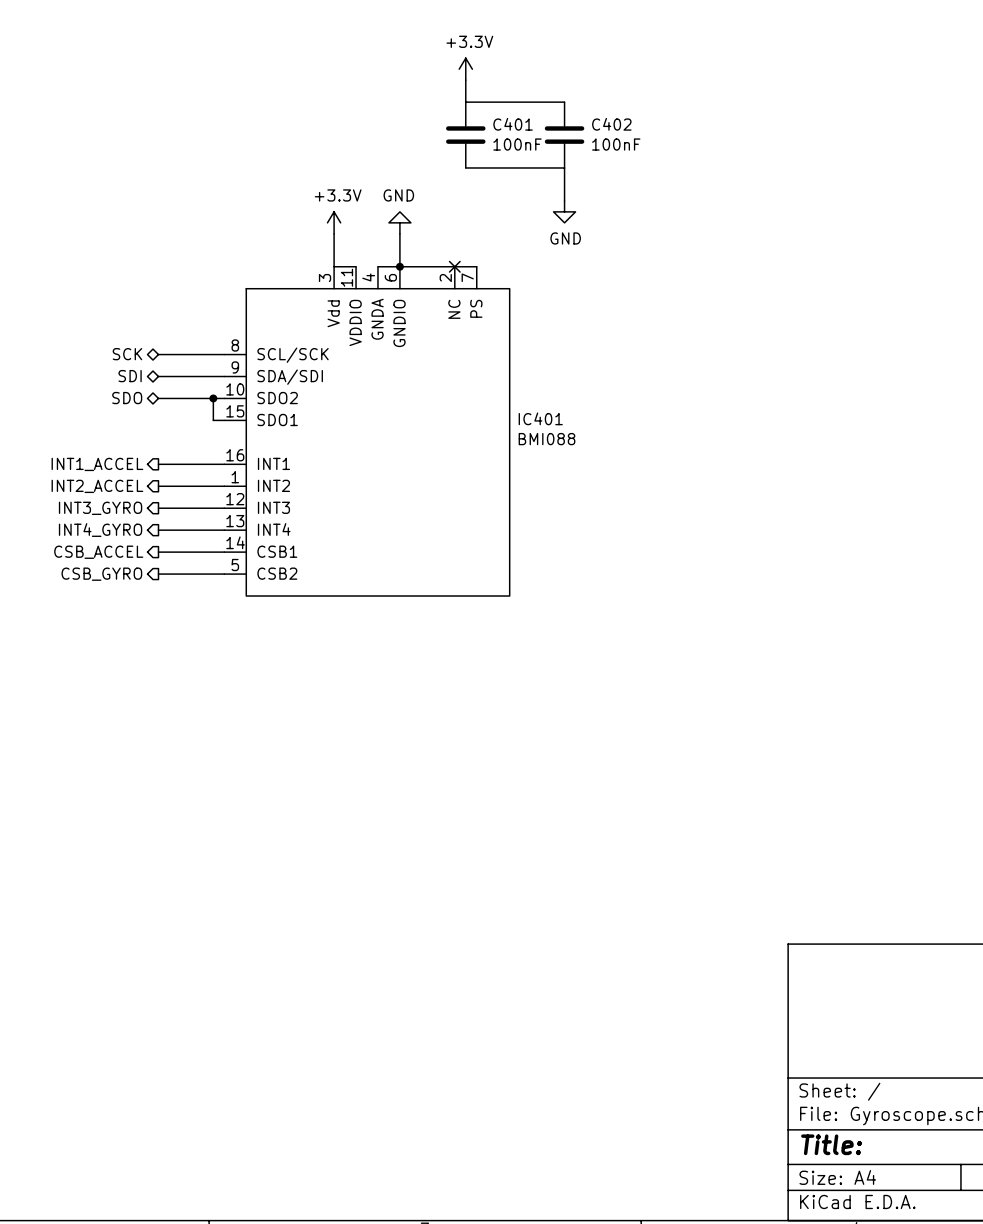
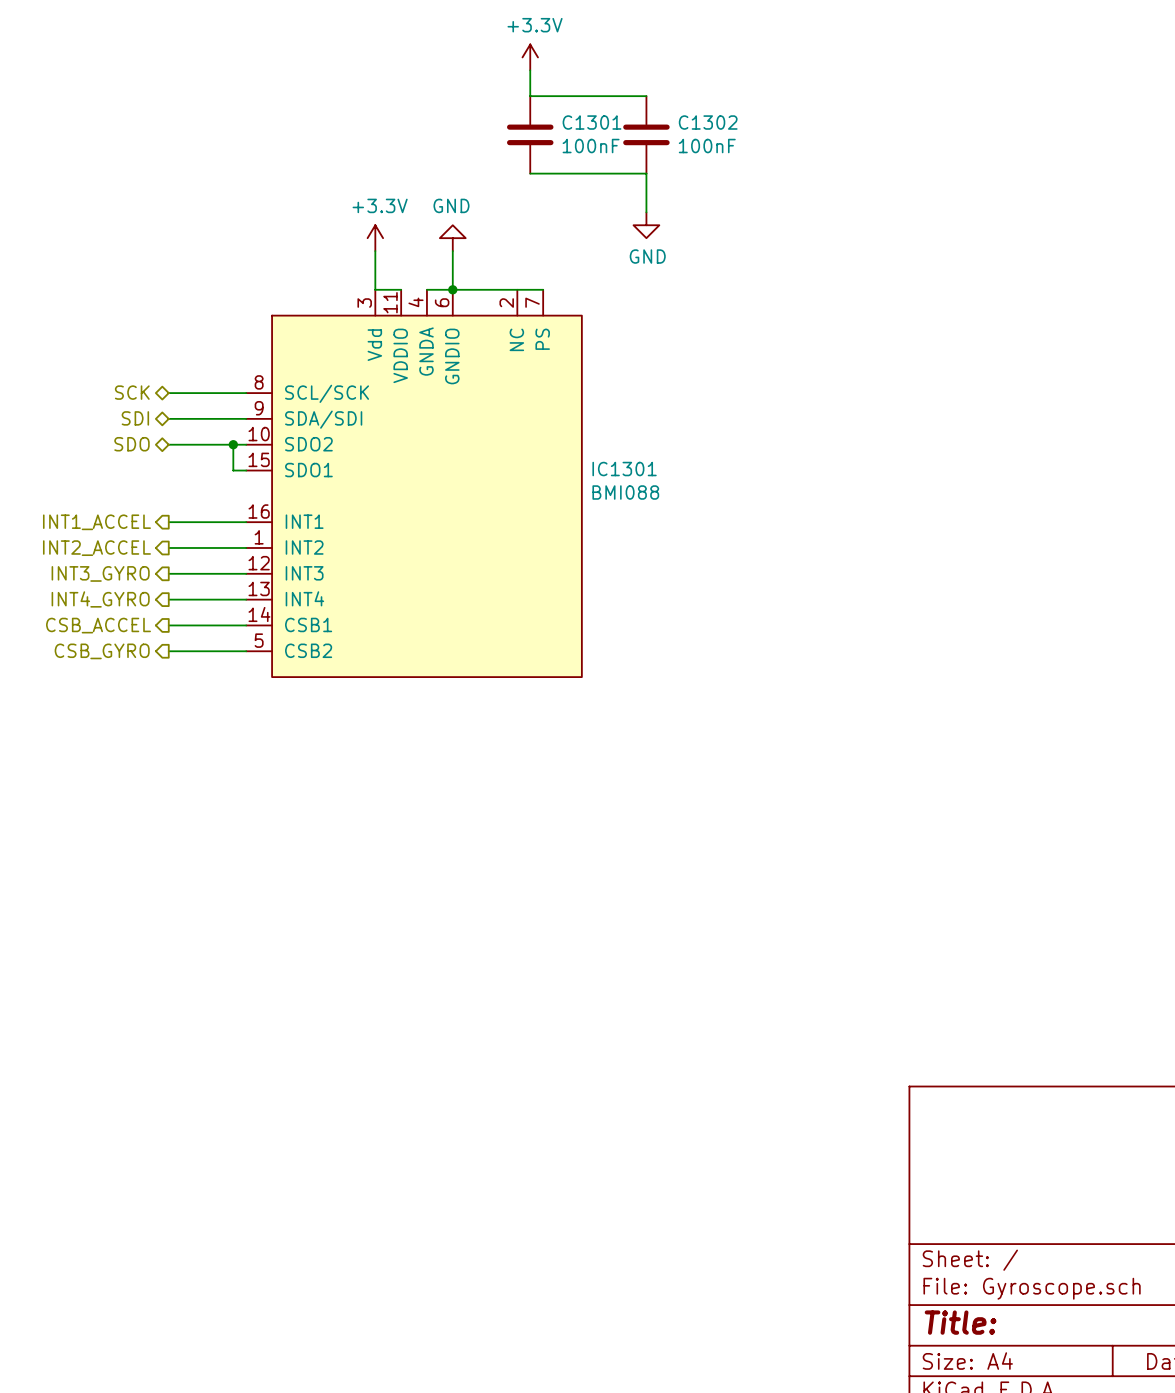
C401 name: C401 (513, 124) -> C1301 (592, 122)
C402 name: C402 (611, 124) -> C1302 (708, 122)
no-connect mark: (454, 266) -> none
IC401 name: IC401 (540, 418) -> IC1301 (624, 469)

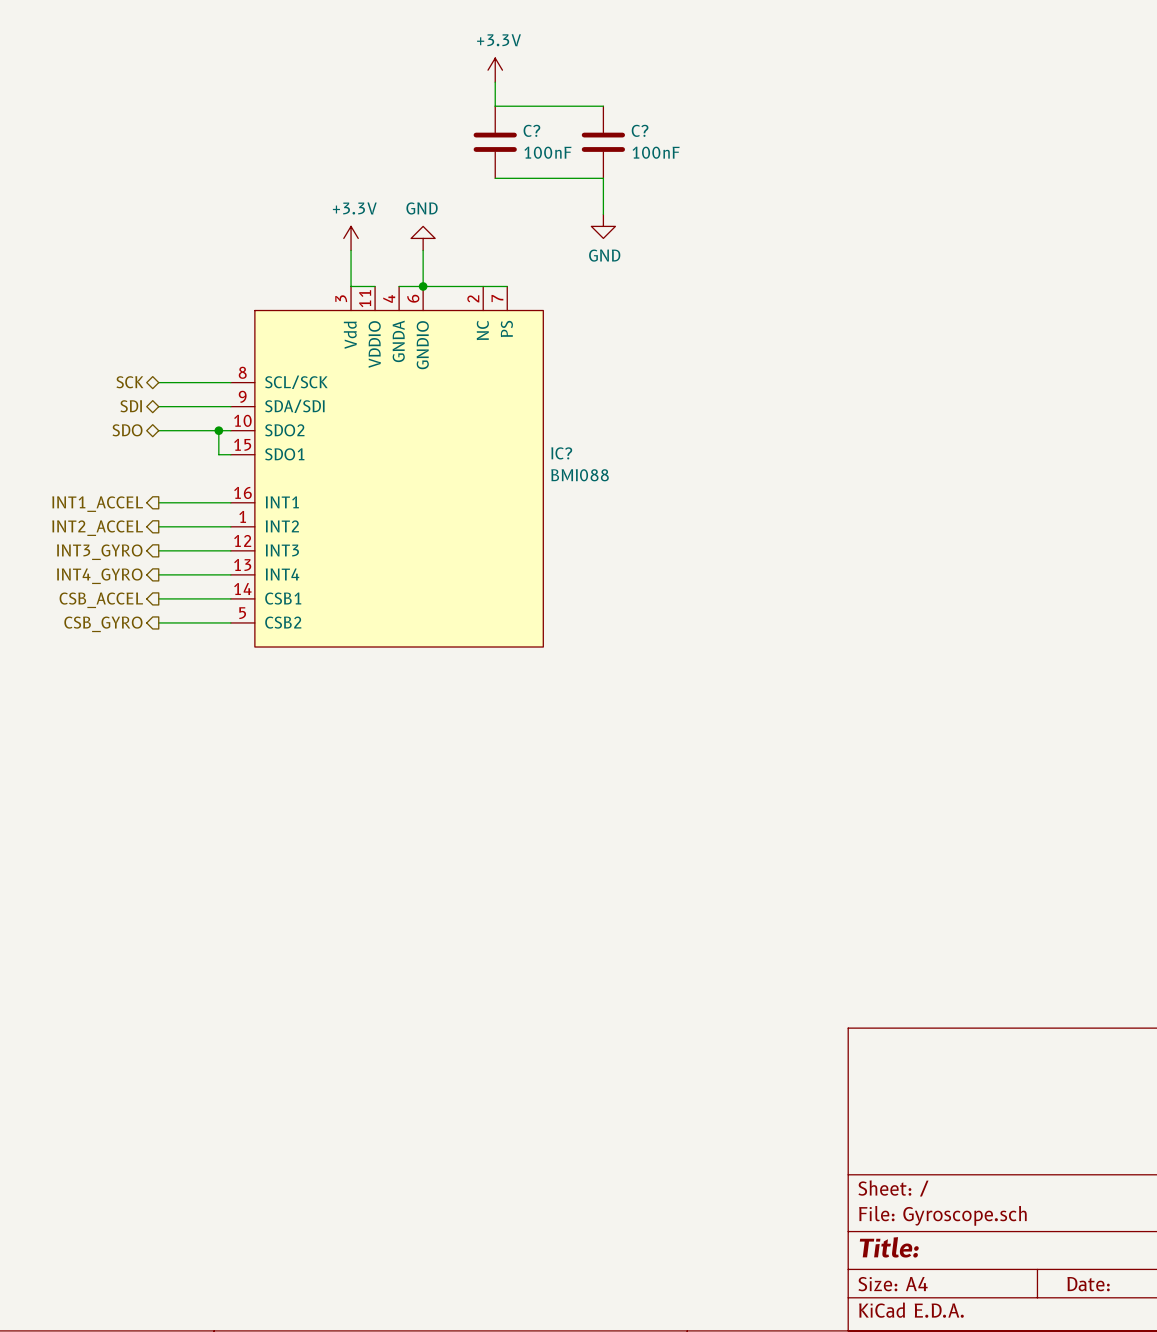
C1301 name: C1301 (592, 122) -> C? (531, 130)
C1302 name: C1302 (708, 122) -> C? (640, 130)
IC1301 name: IC1301 (624, 469) -> IC? (561, 453)

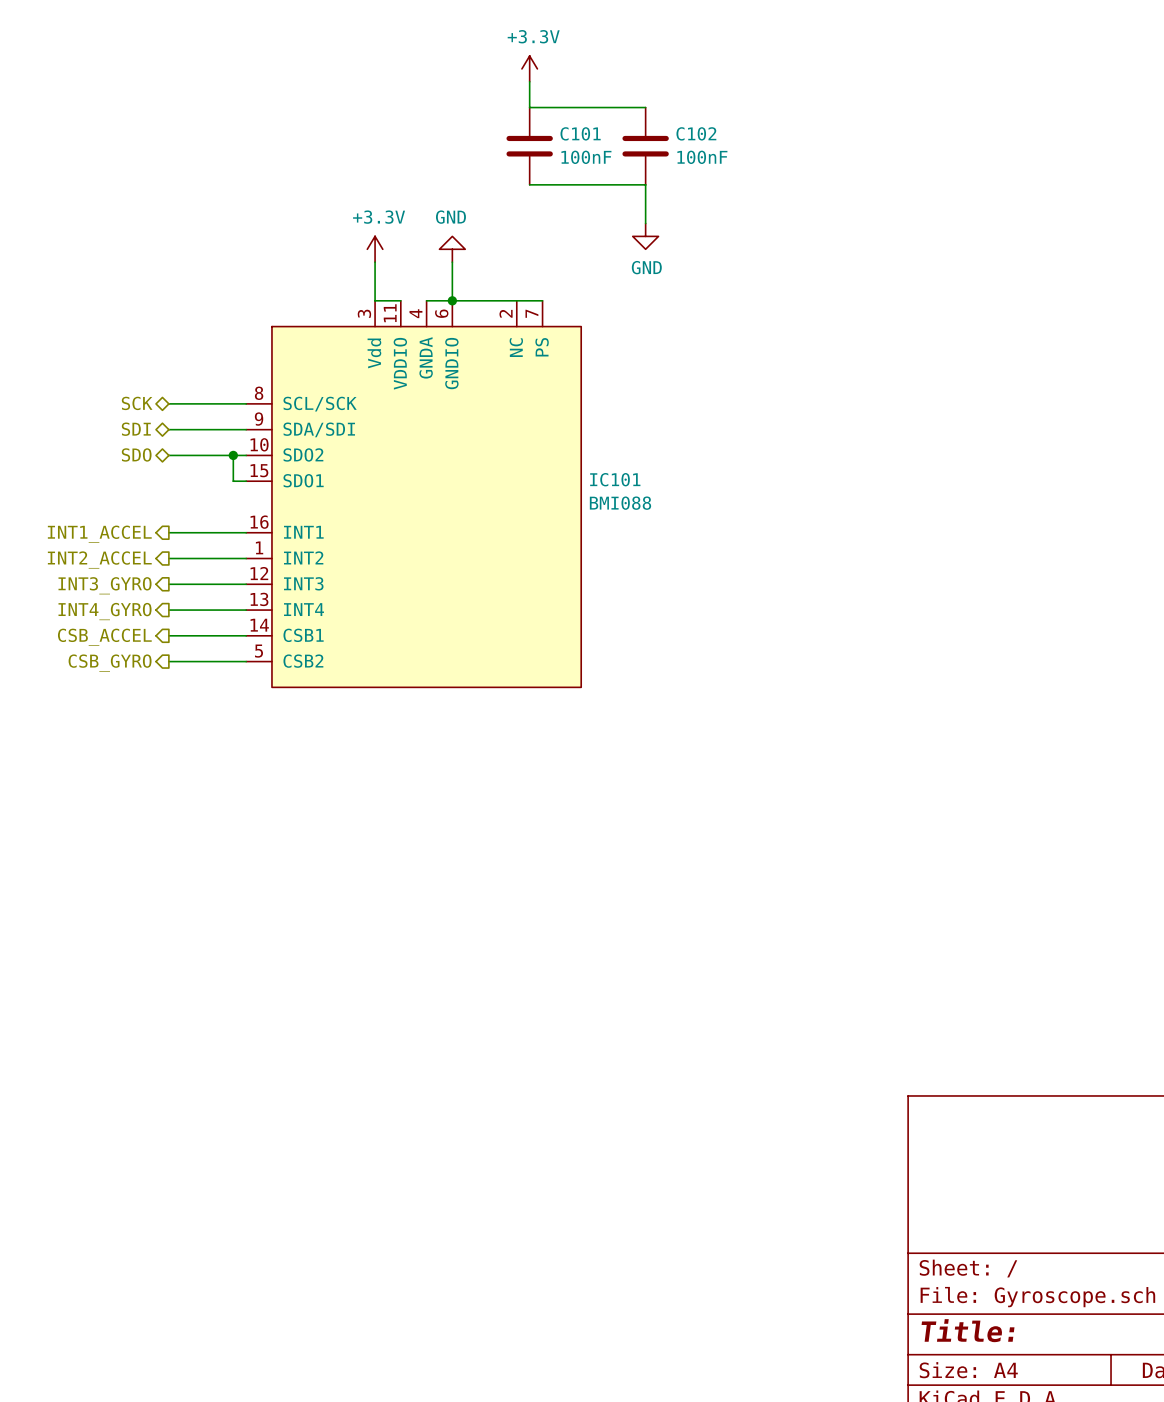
C? name: C? (531, 130) -> C101 (580, 133)
C? name: C? (640, 130) -> C102 (696, 133)
IC? name: IC? (561, 453) -> IC101 (615, 479)

